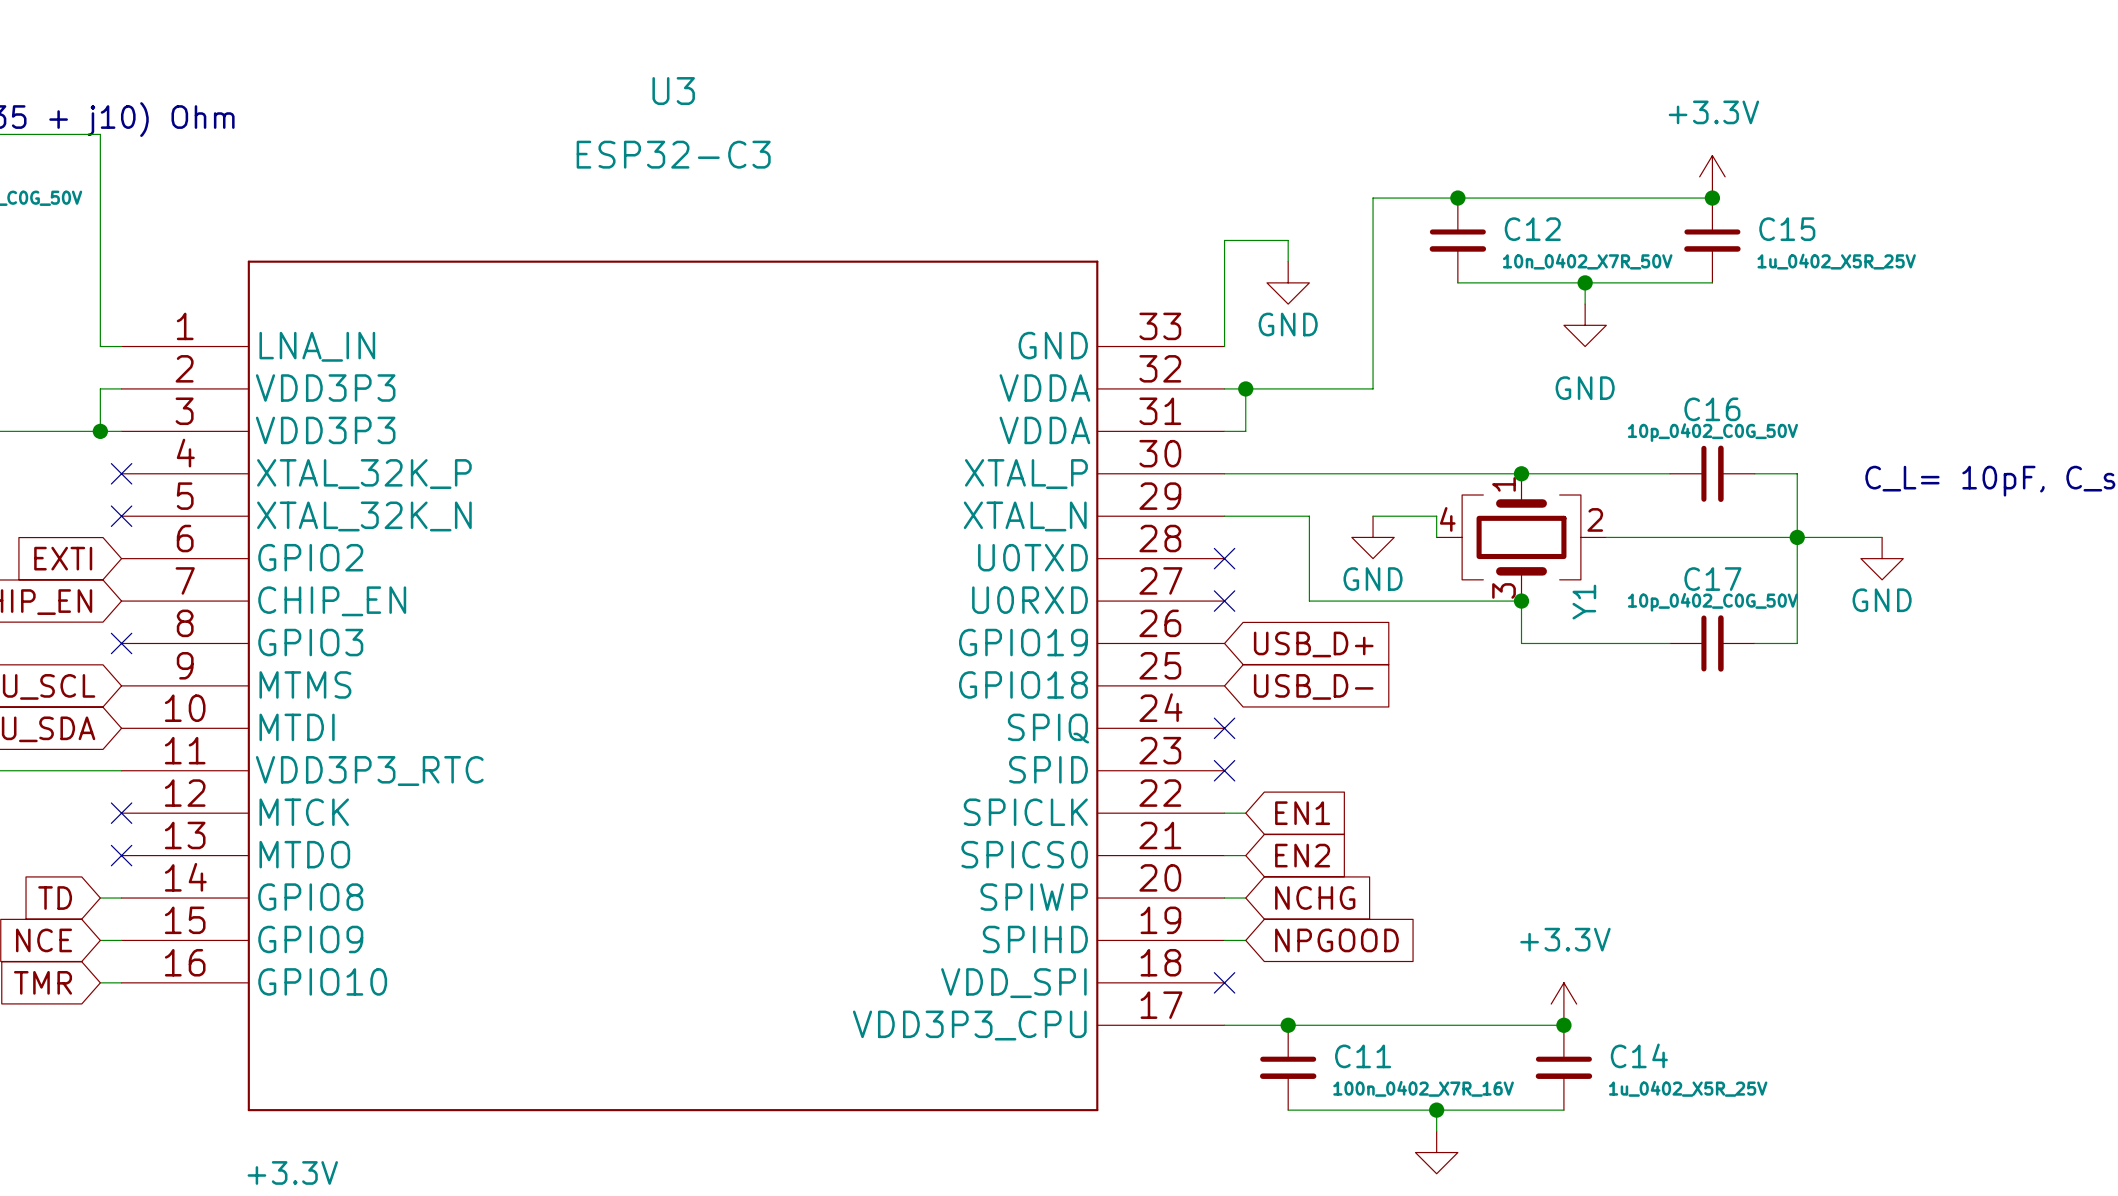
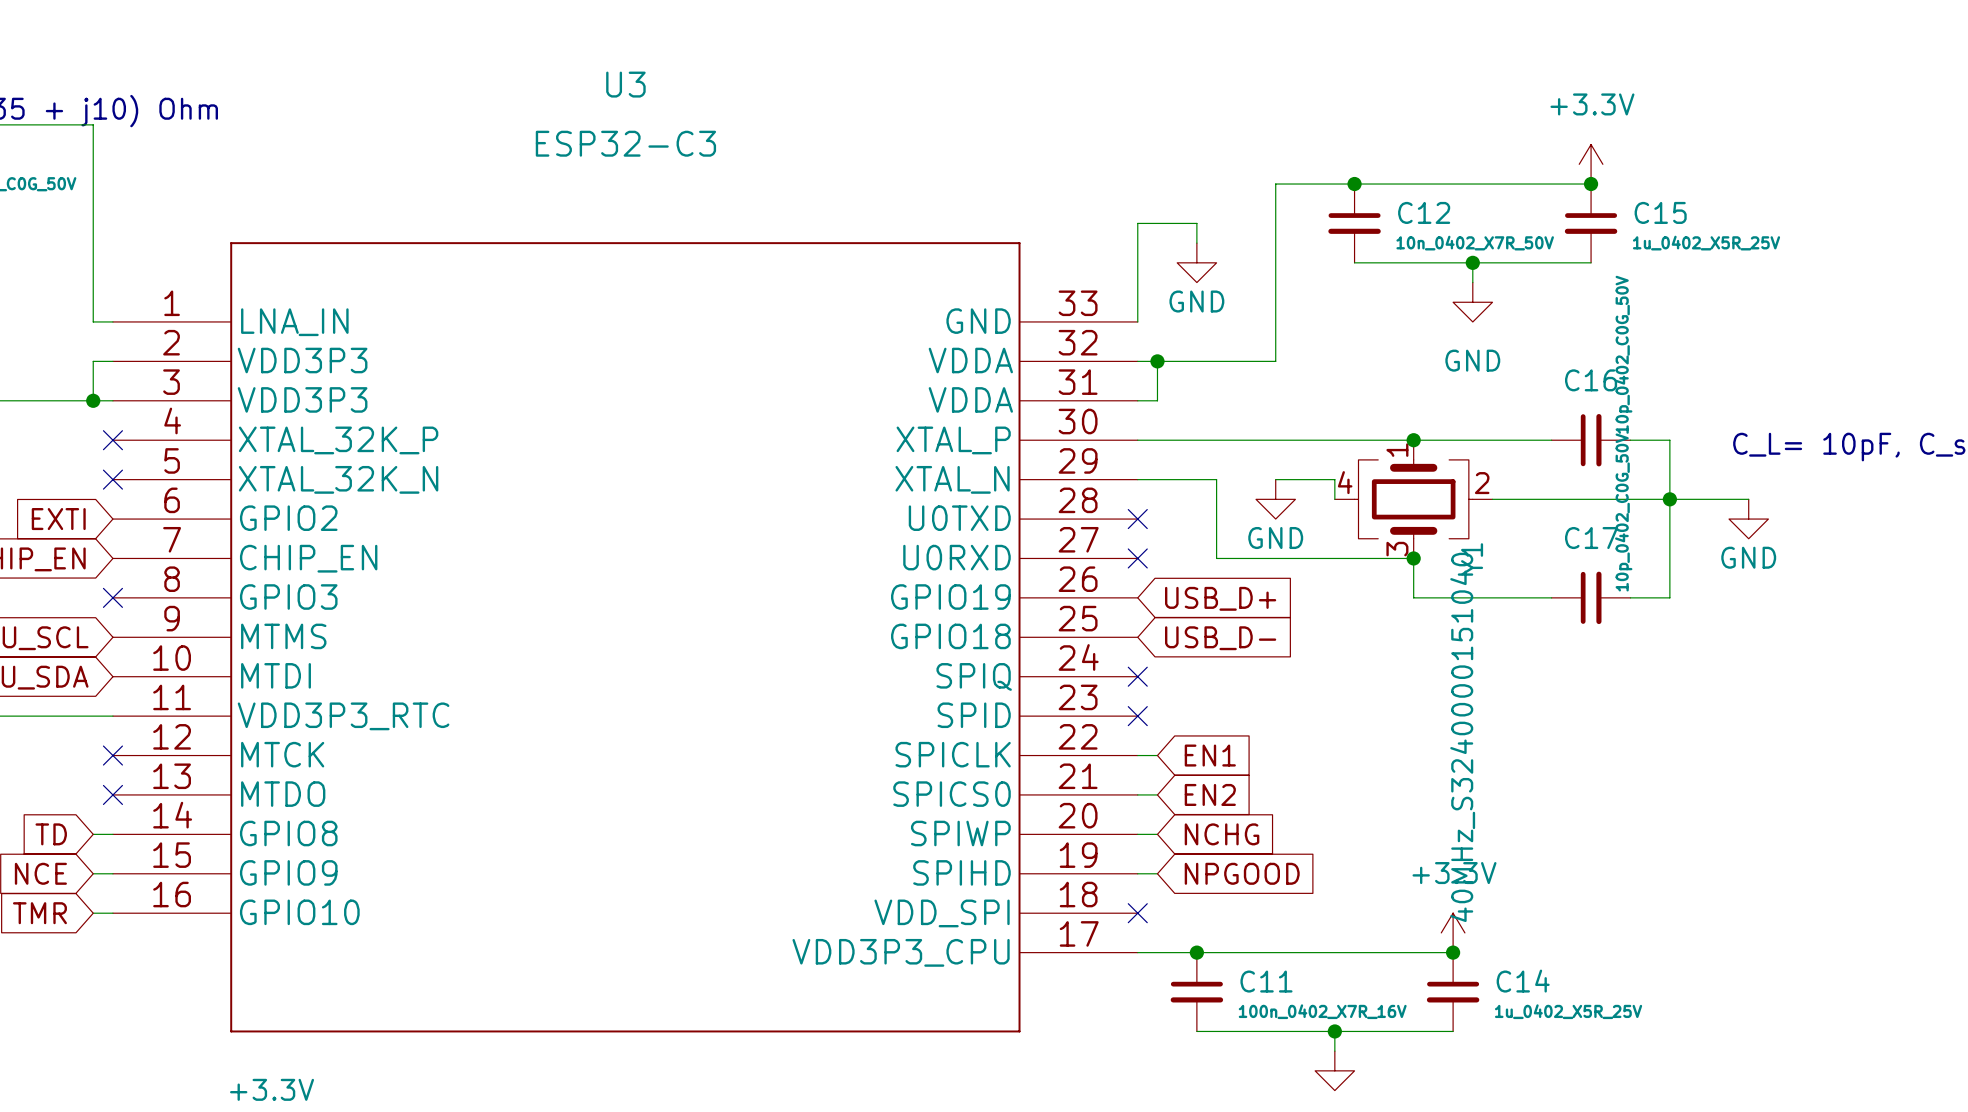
C16 value rotation: 0° (1712, 432) -> 90° counterclockwise (1623, 354)
C17 value rotation: 0° (1712, 602) -> 90° counterclockwise (1623, 512)
Y1 value: none -> 40MHz_S3240000151040 (1462, 737)

